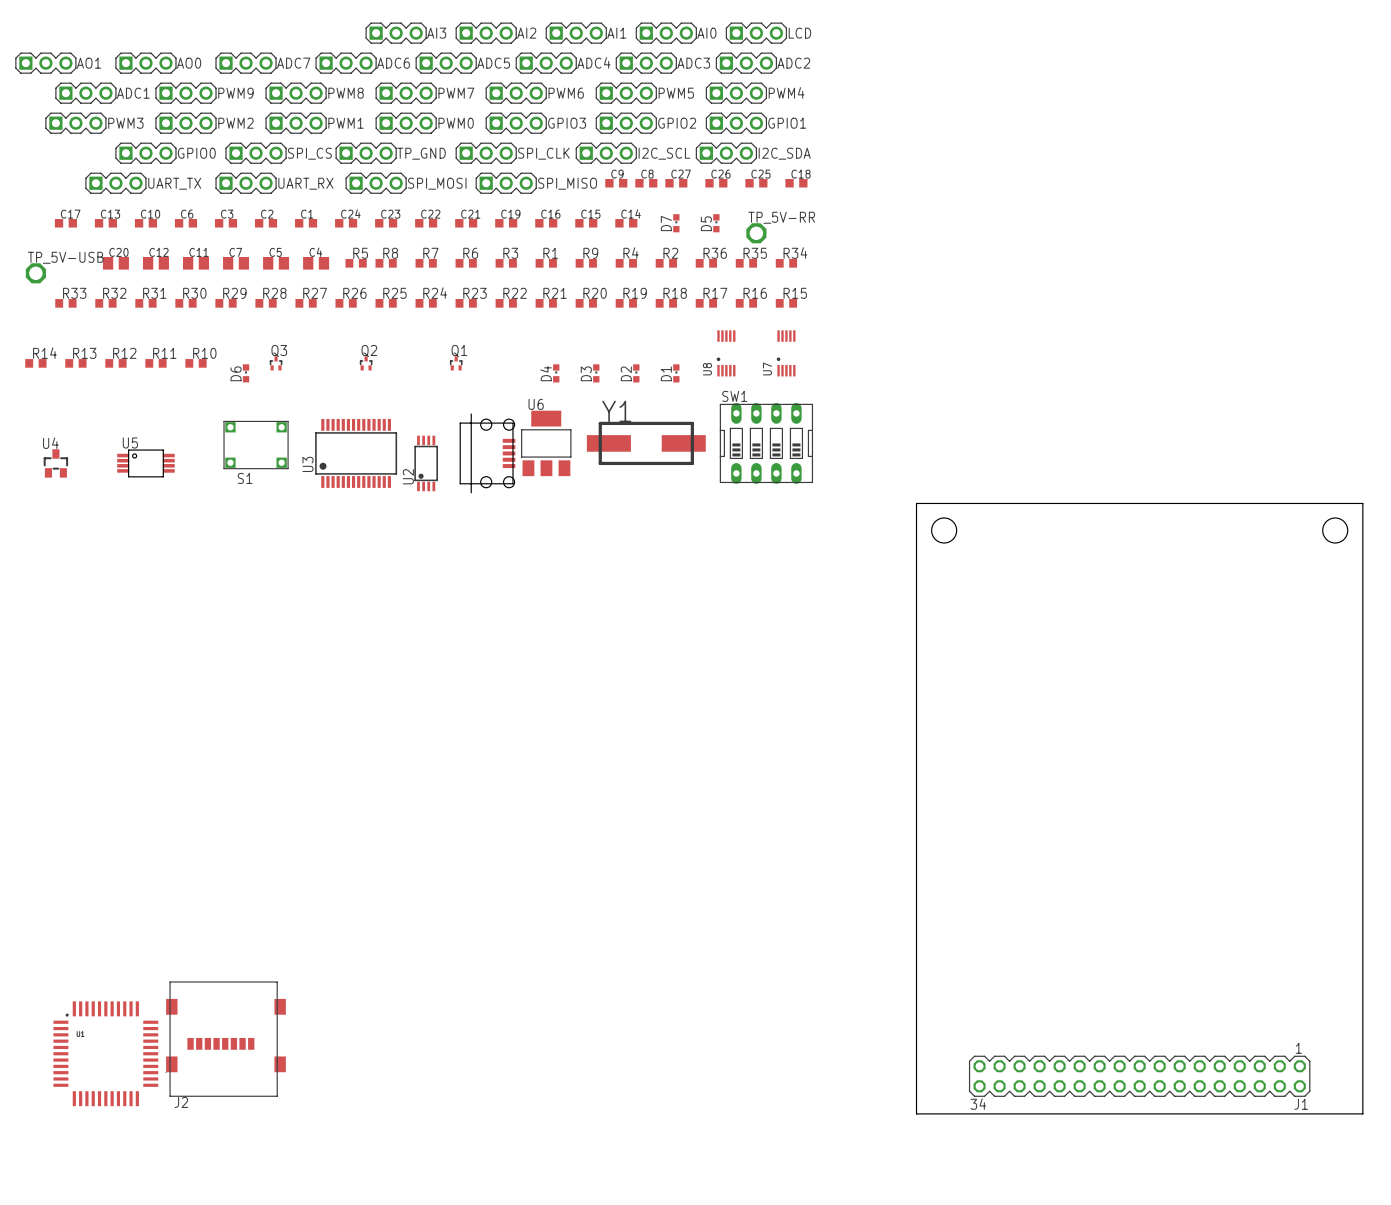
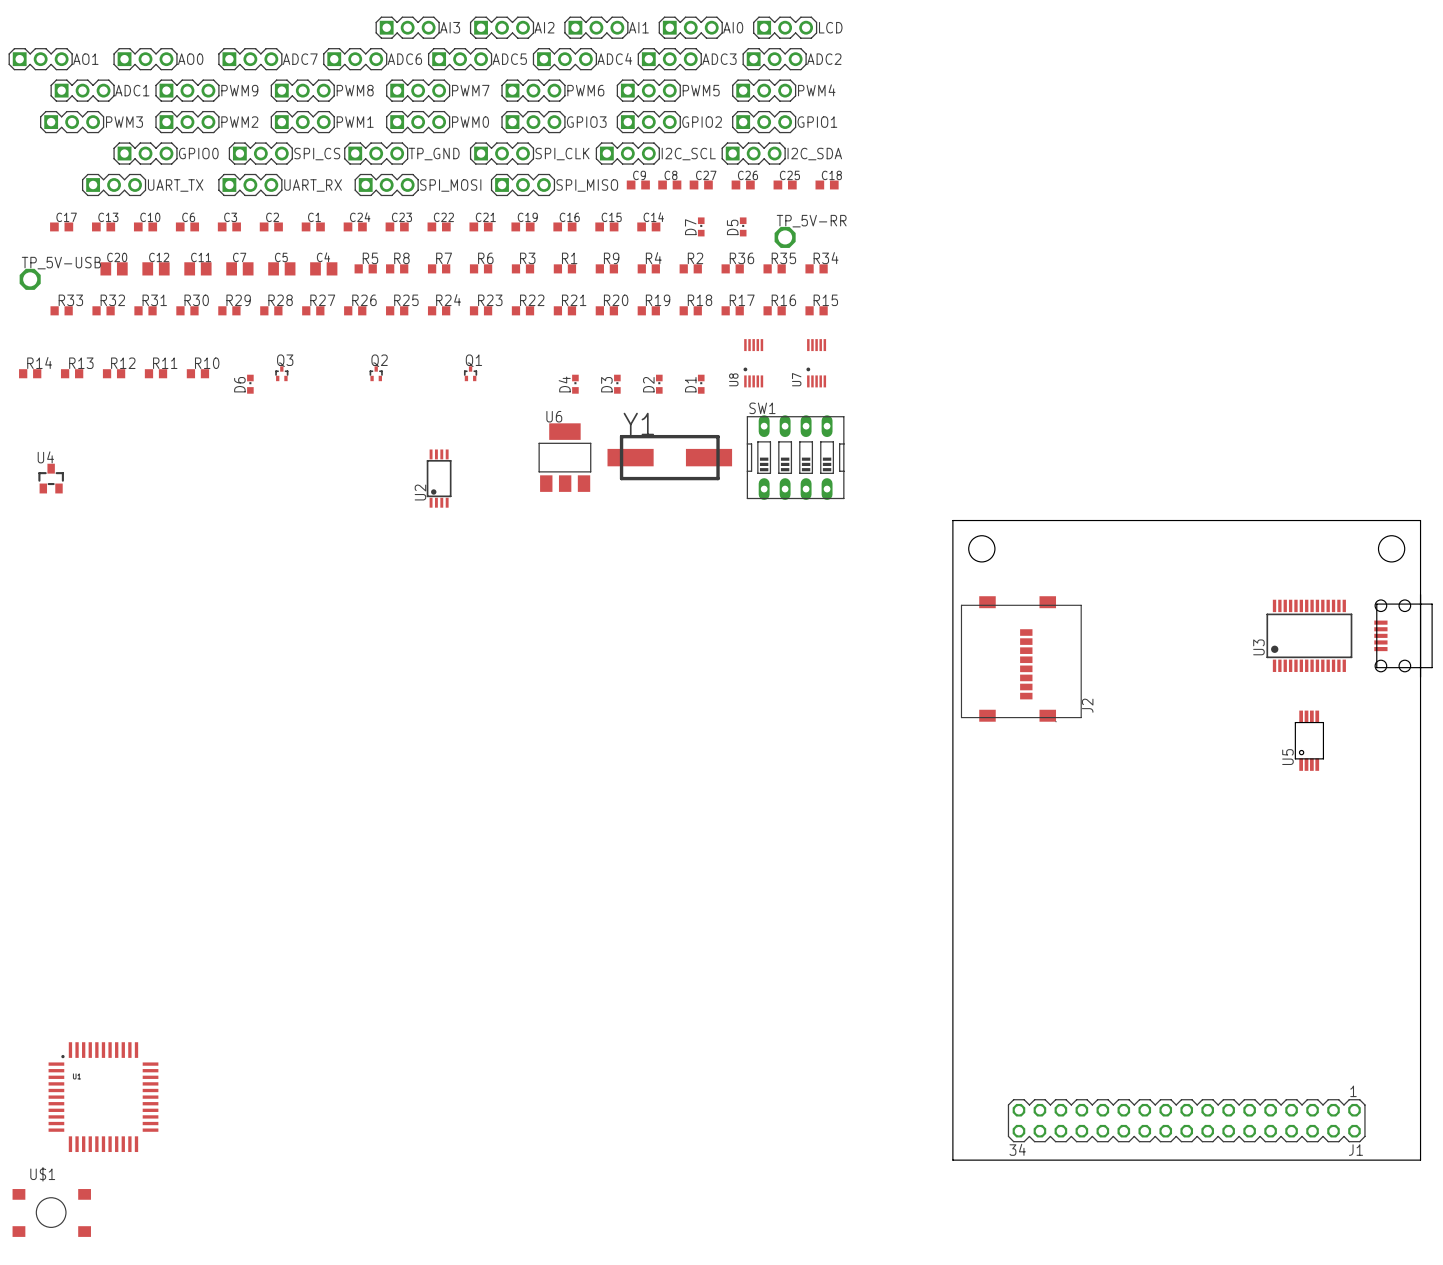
S1: (256, 445) -> none
U3 position: (356, 453) -> (1309, 635)
part: (487, 453) -> none
U5 rotation: 0° (145, 463) -> 90° counterclockwise (1309, 740)
U5 position: (145, 463) -> (1309, 740)
part: none -> (1403, 635)
J2 rotation: 0° (225, 1039) -> 90° counterclockwise (1021, 658)
J2 position: (225, 1039) -> (1021, 658)
U$1: none -> (51, 1212)

